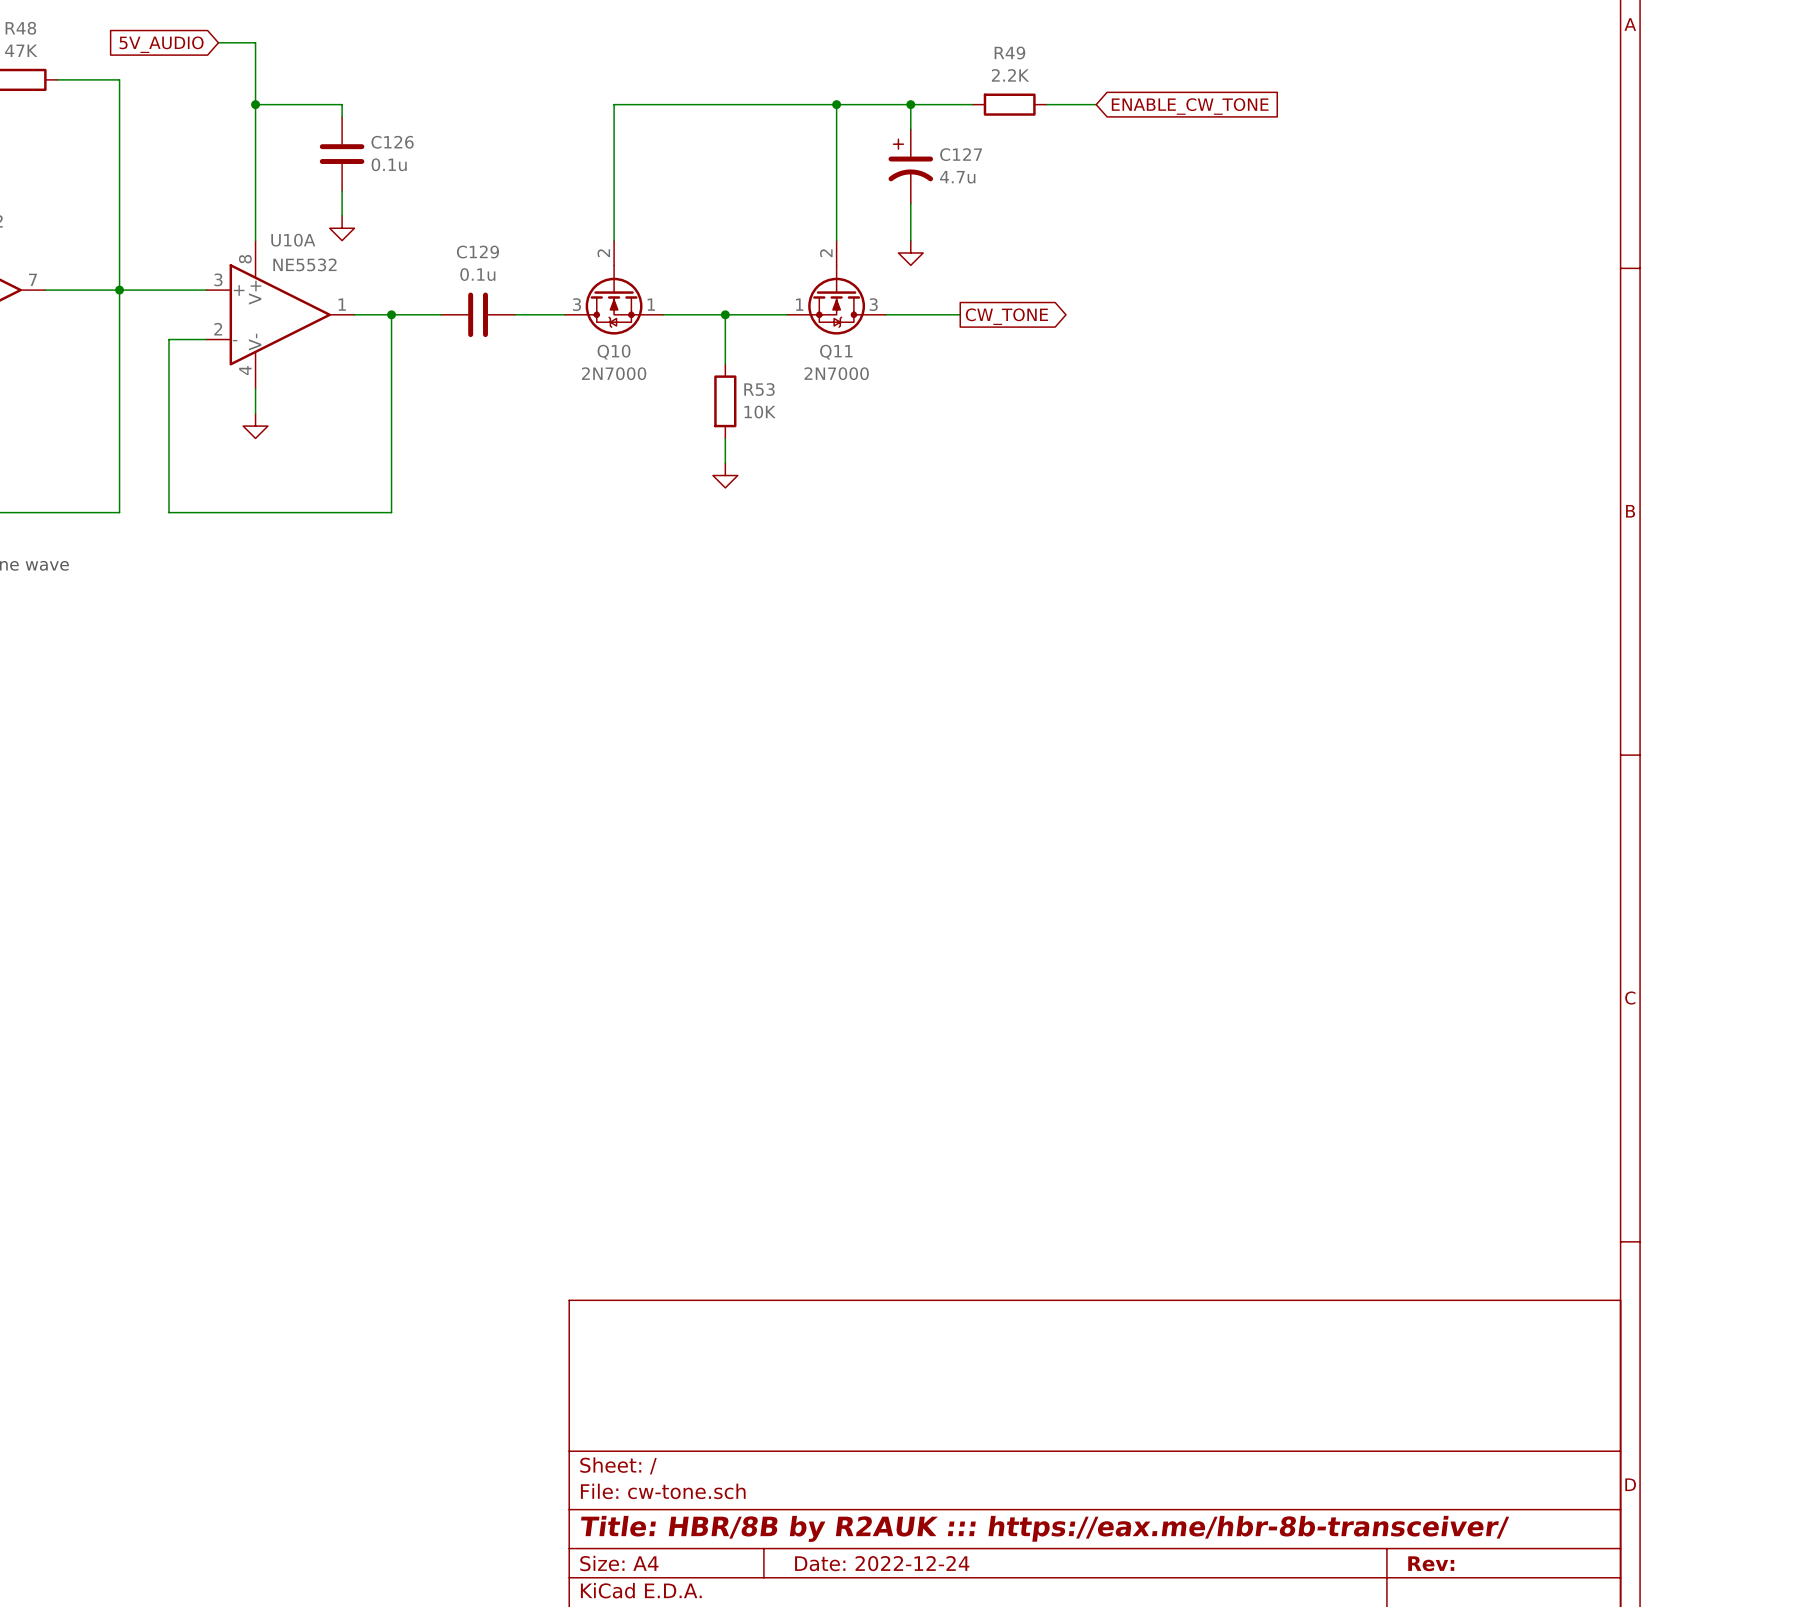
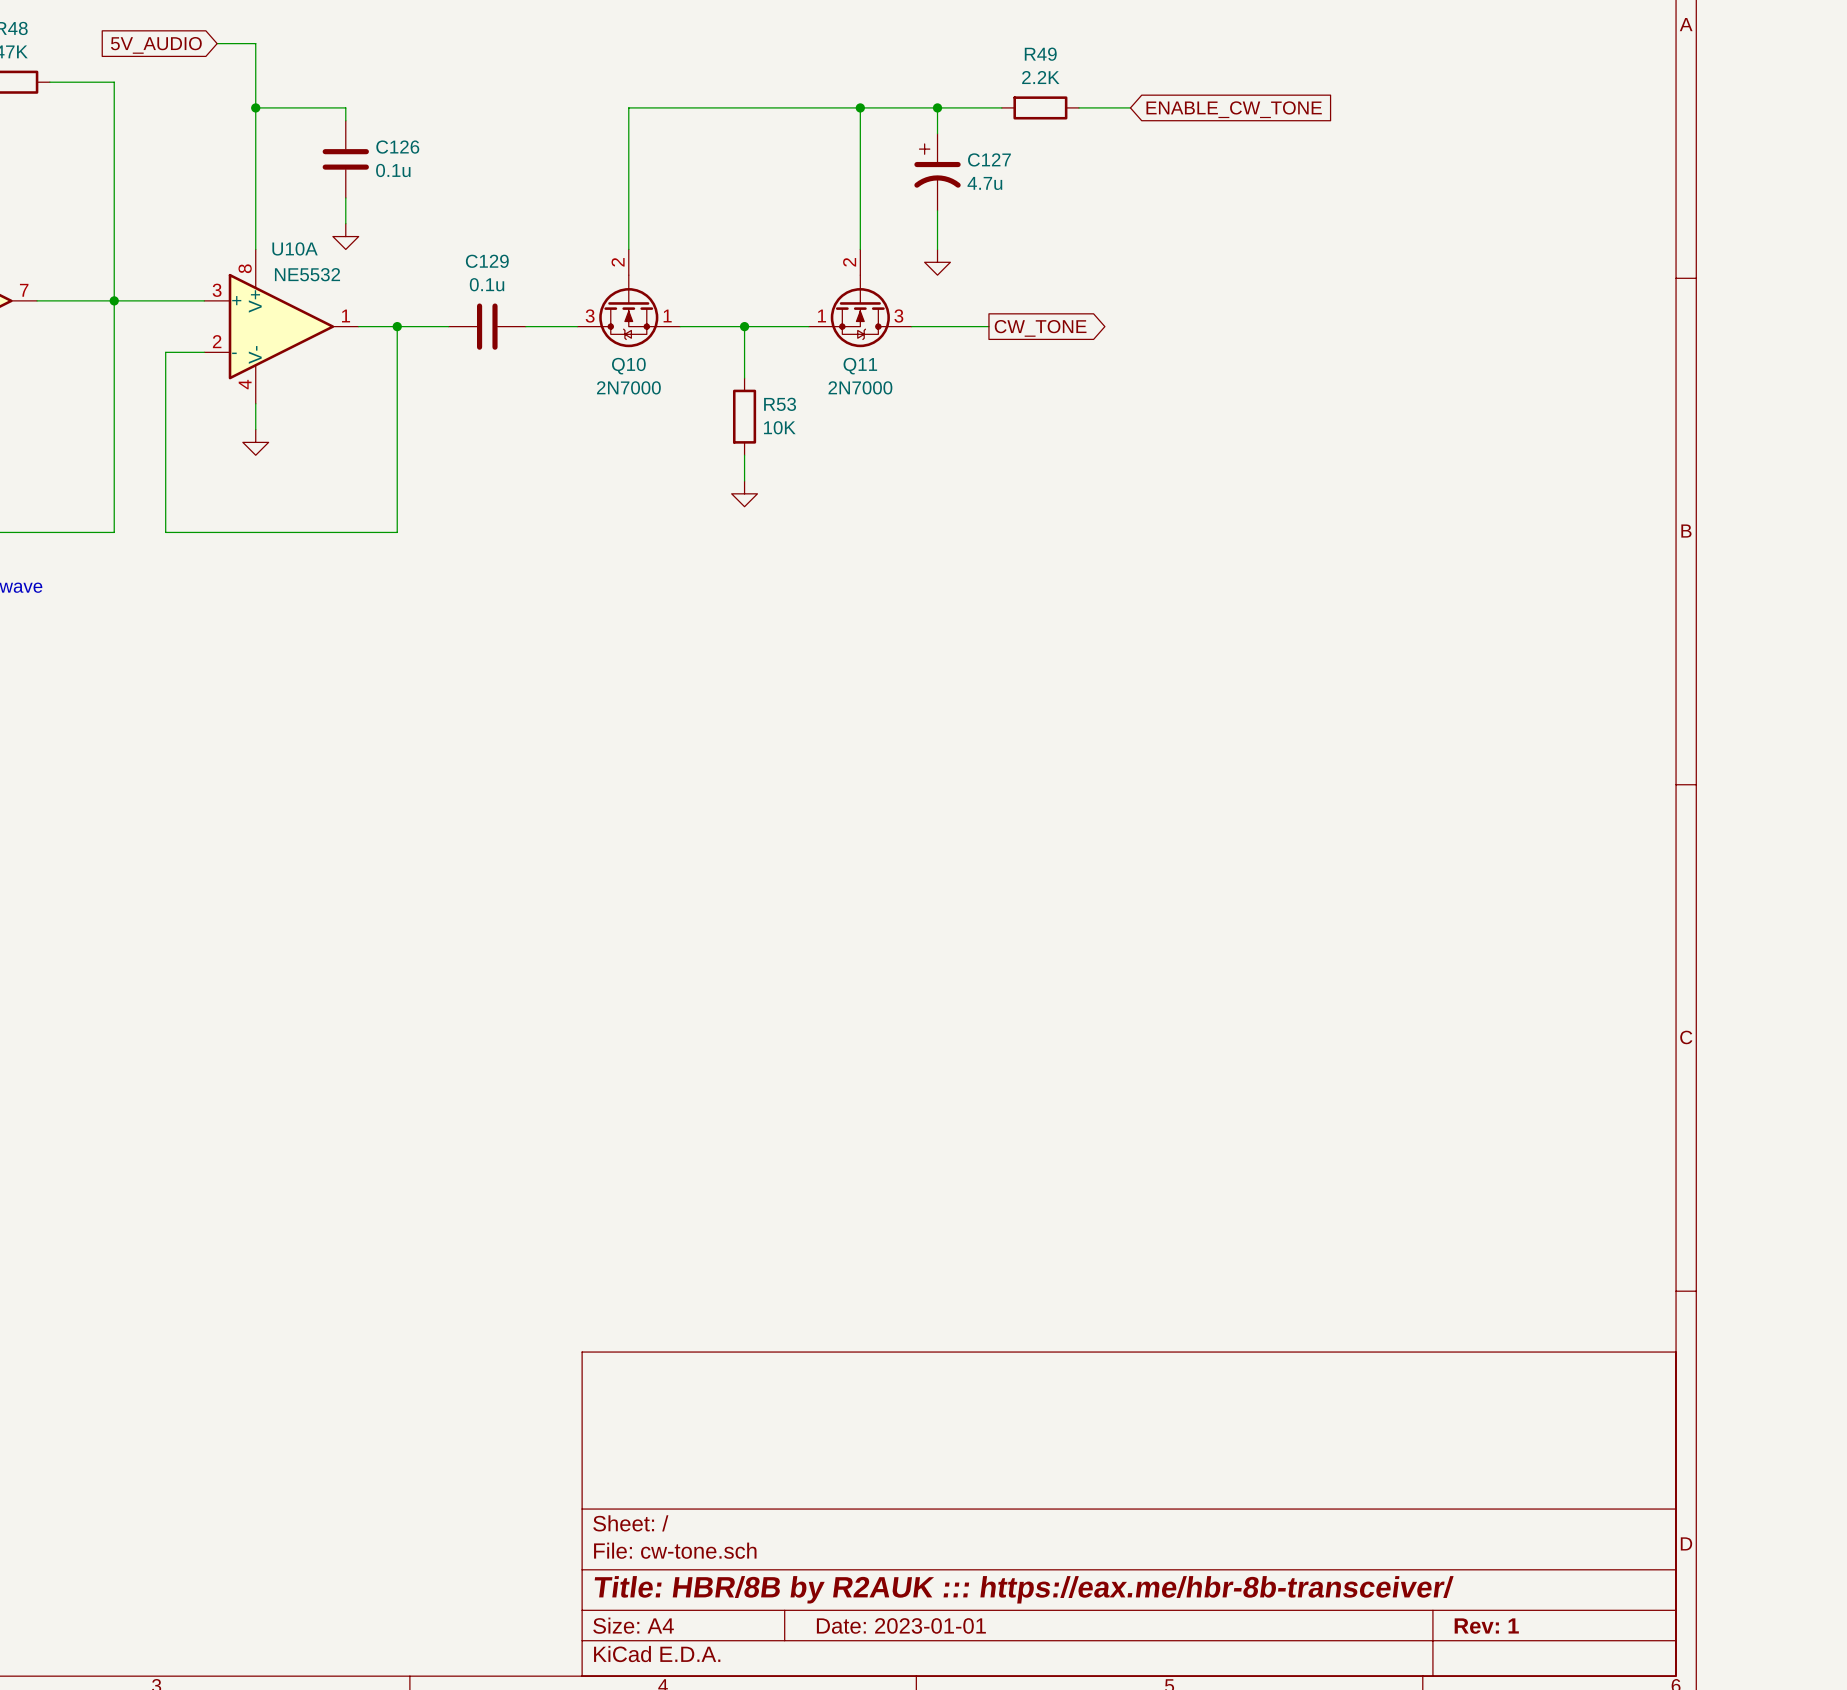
title block: Date: 2022-12-24 (882, 1563) -> Date: 2023-01-01 (901, 1625)
title block: Rev: (1431, 1563) -> Rev: 1 (1486, 1626)

